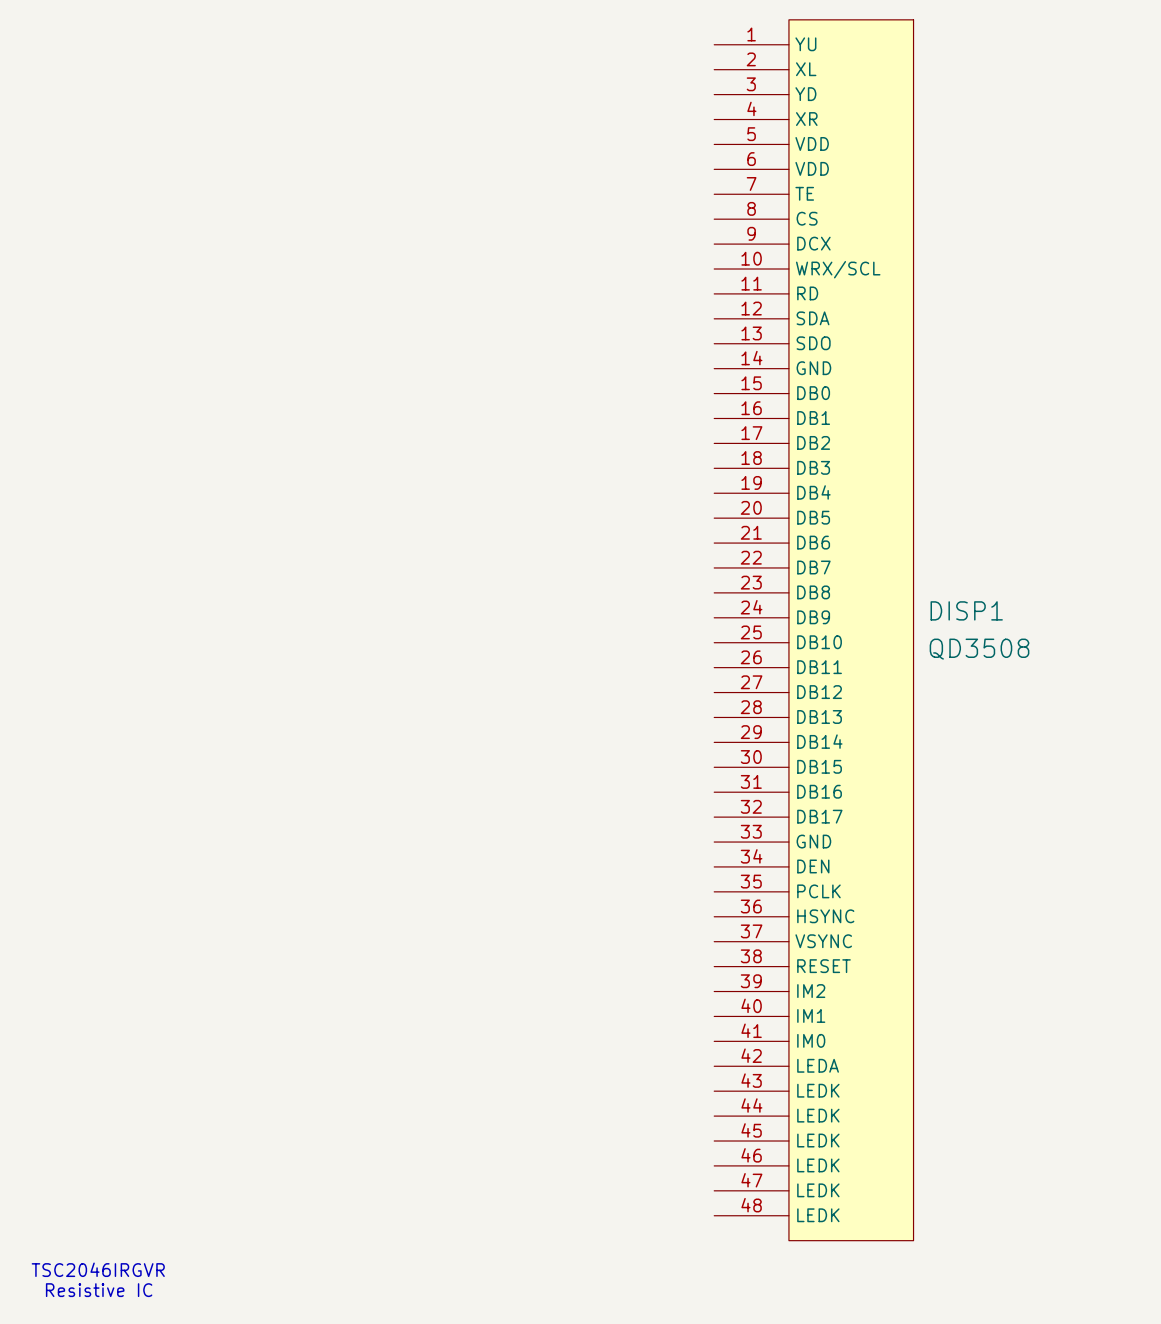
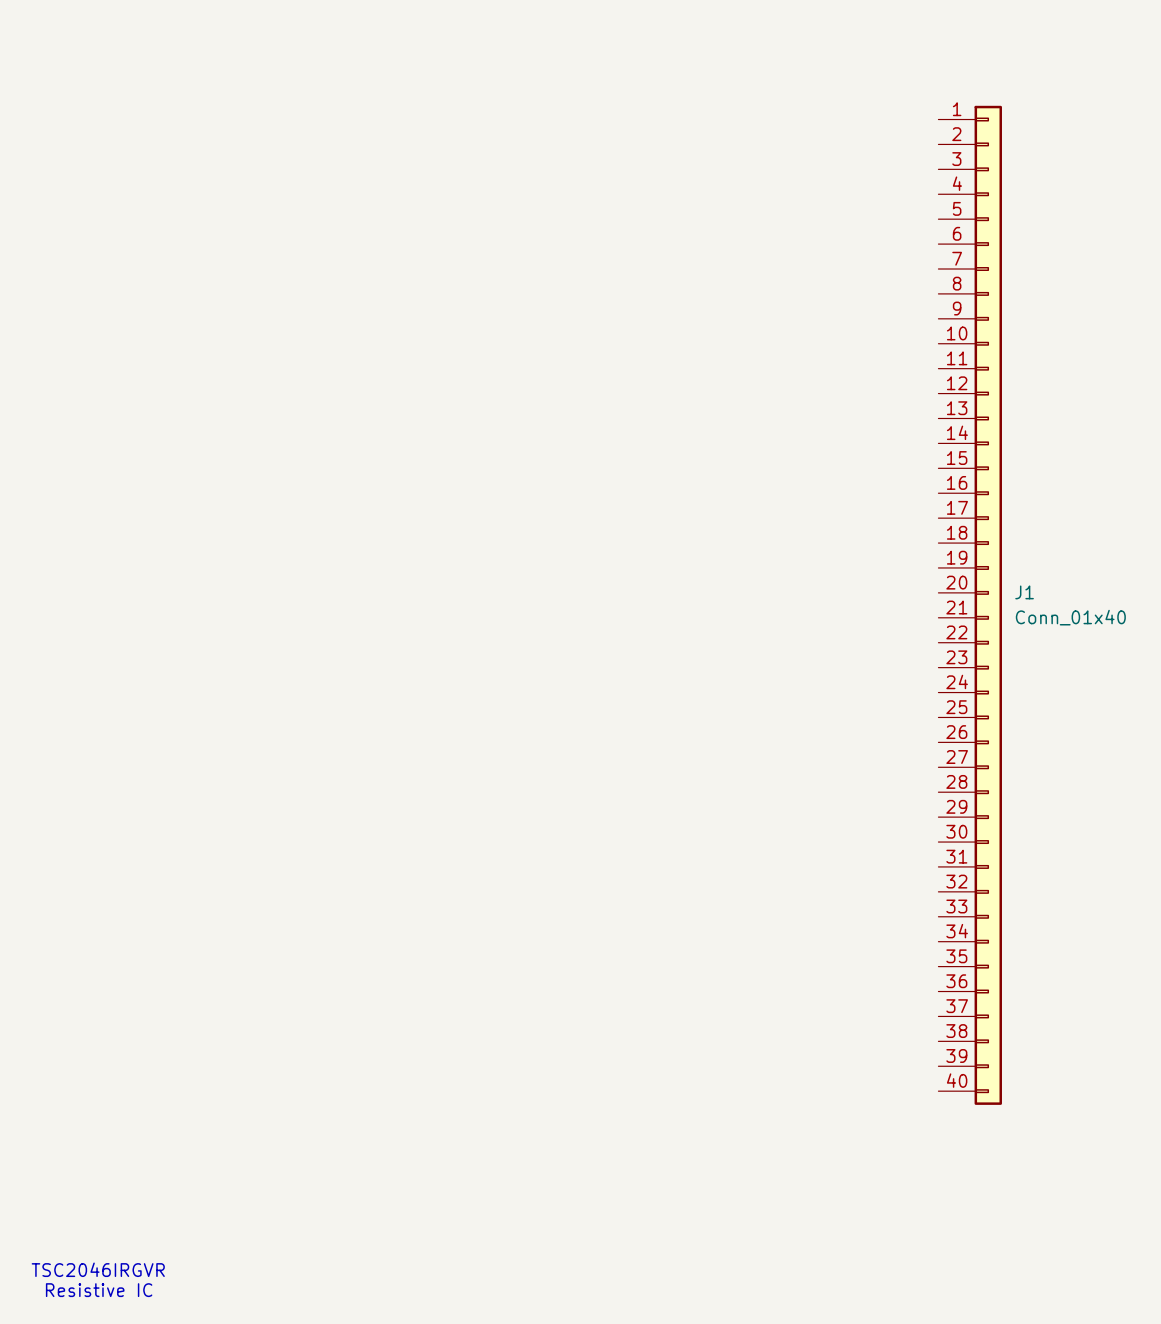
J1: none -> Conn_01x40 (970, 605)
DISP1: QD3508 (813, 630) -> none

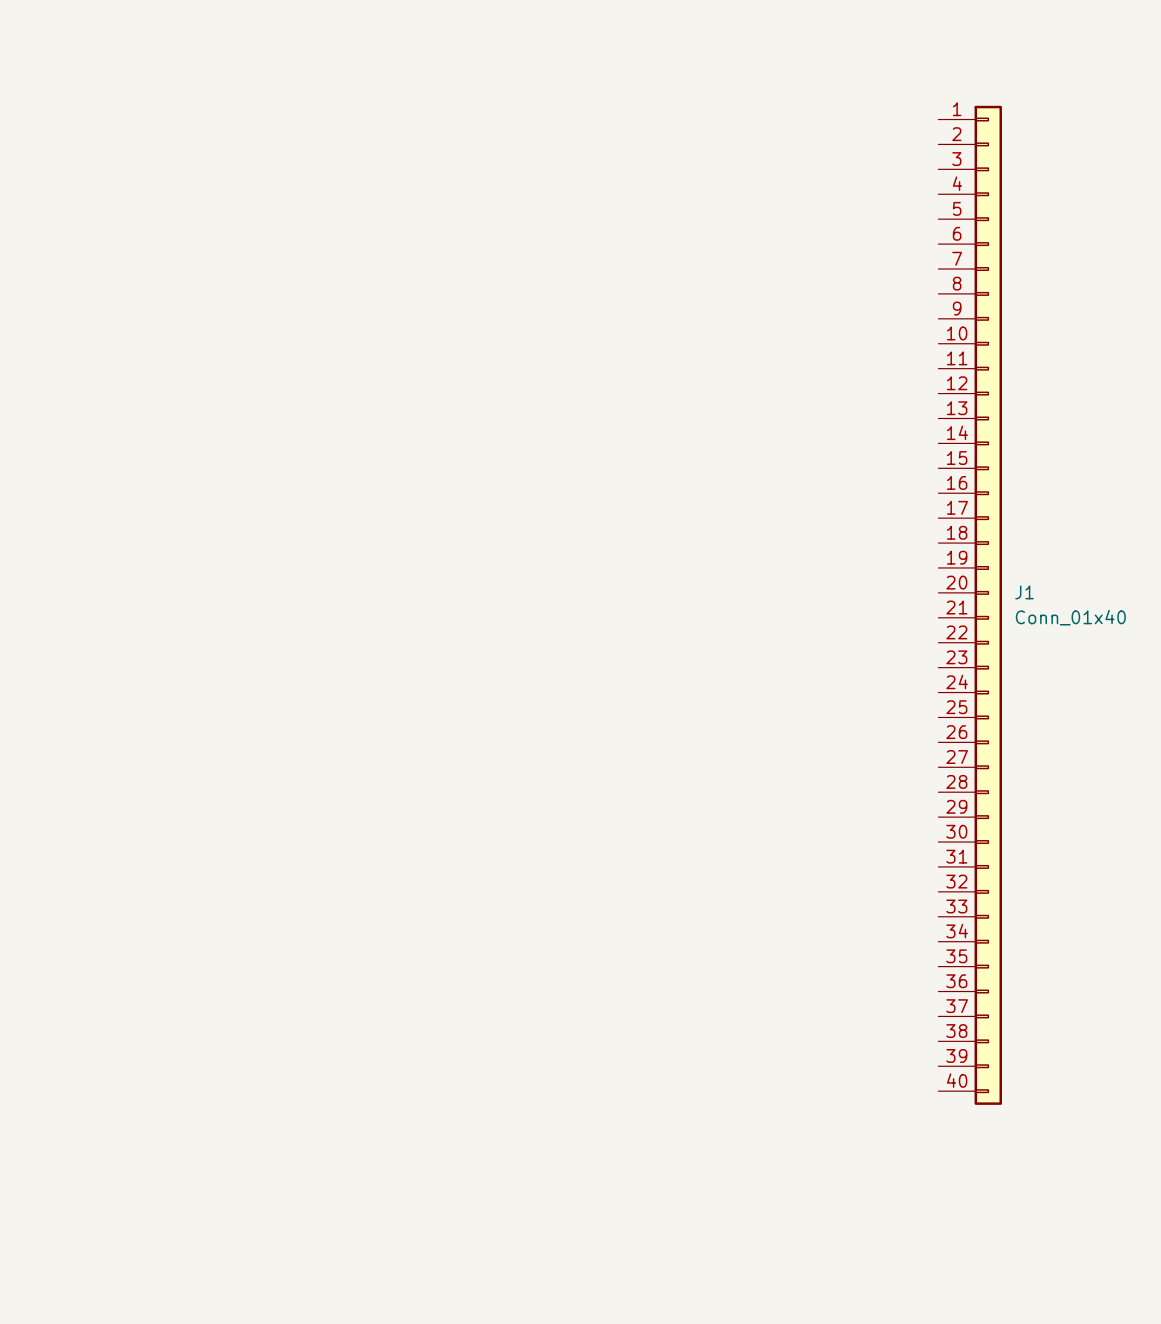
text: TSC2046IRGVR (98, 1269) -> none
text: Resistive IC (99, 1290) -> none

